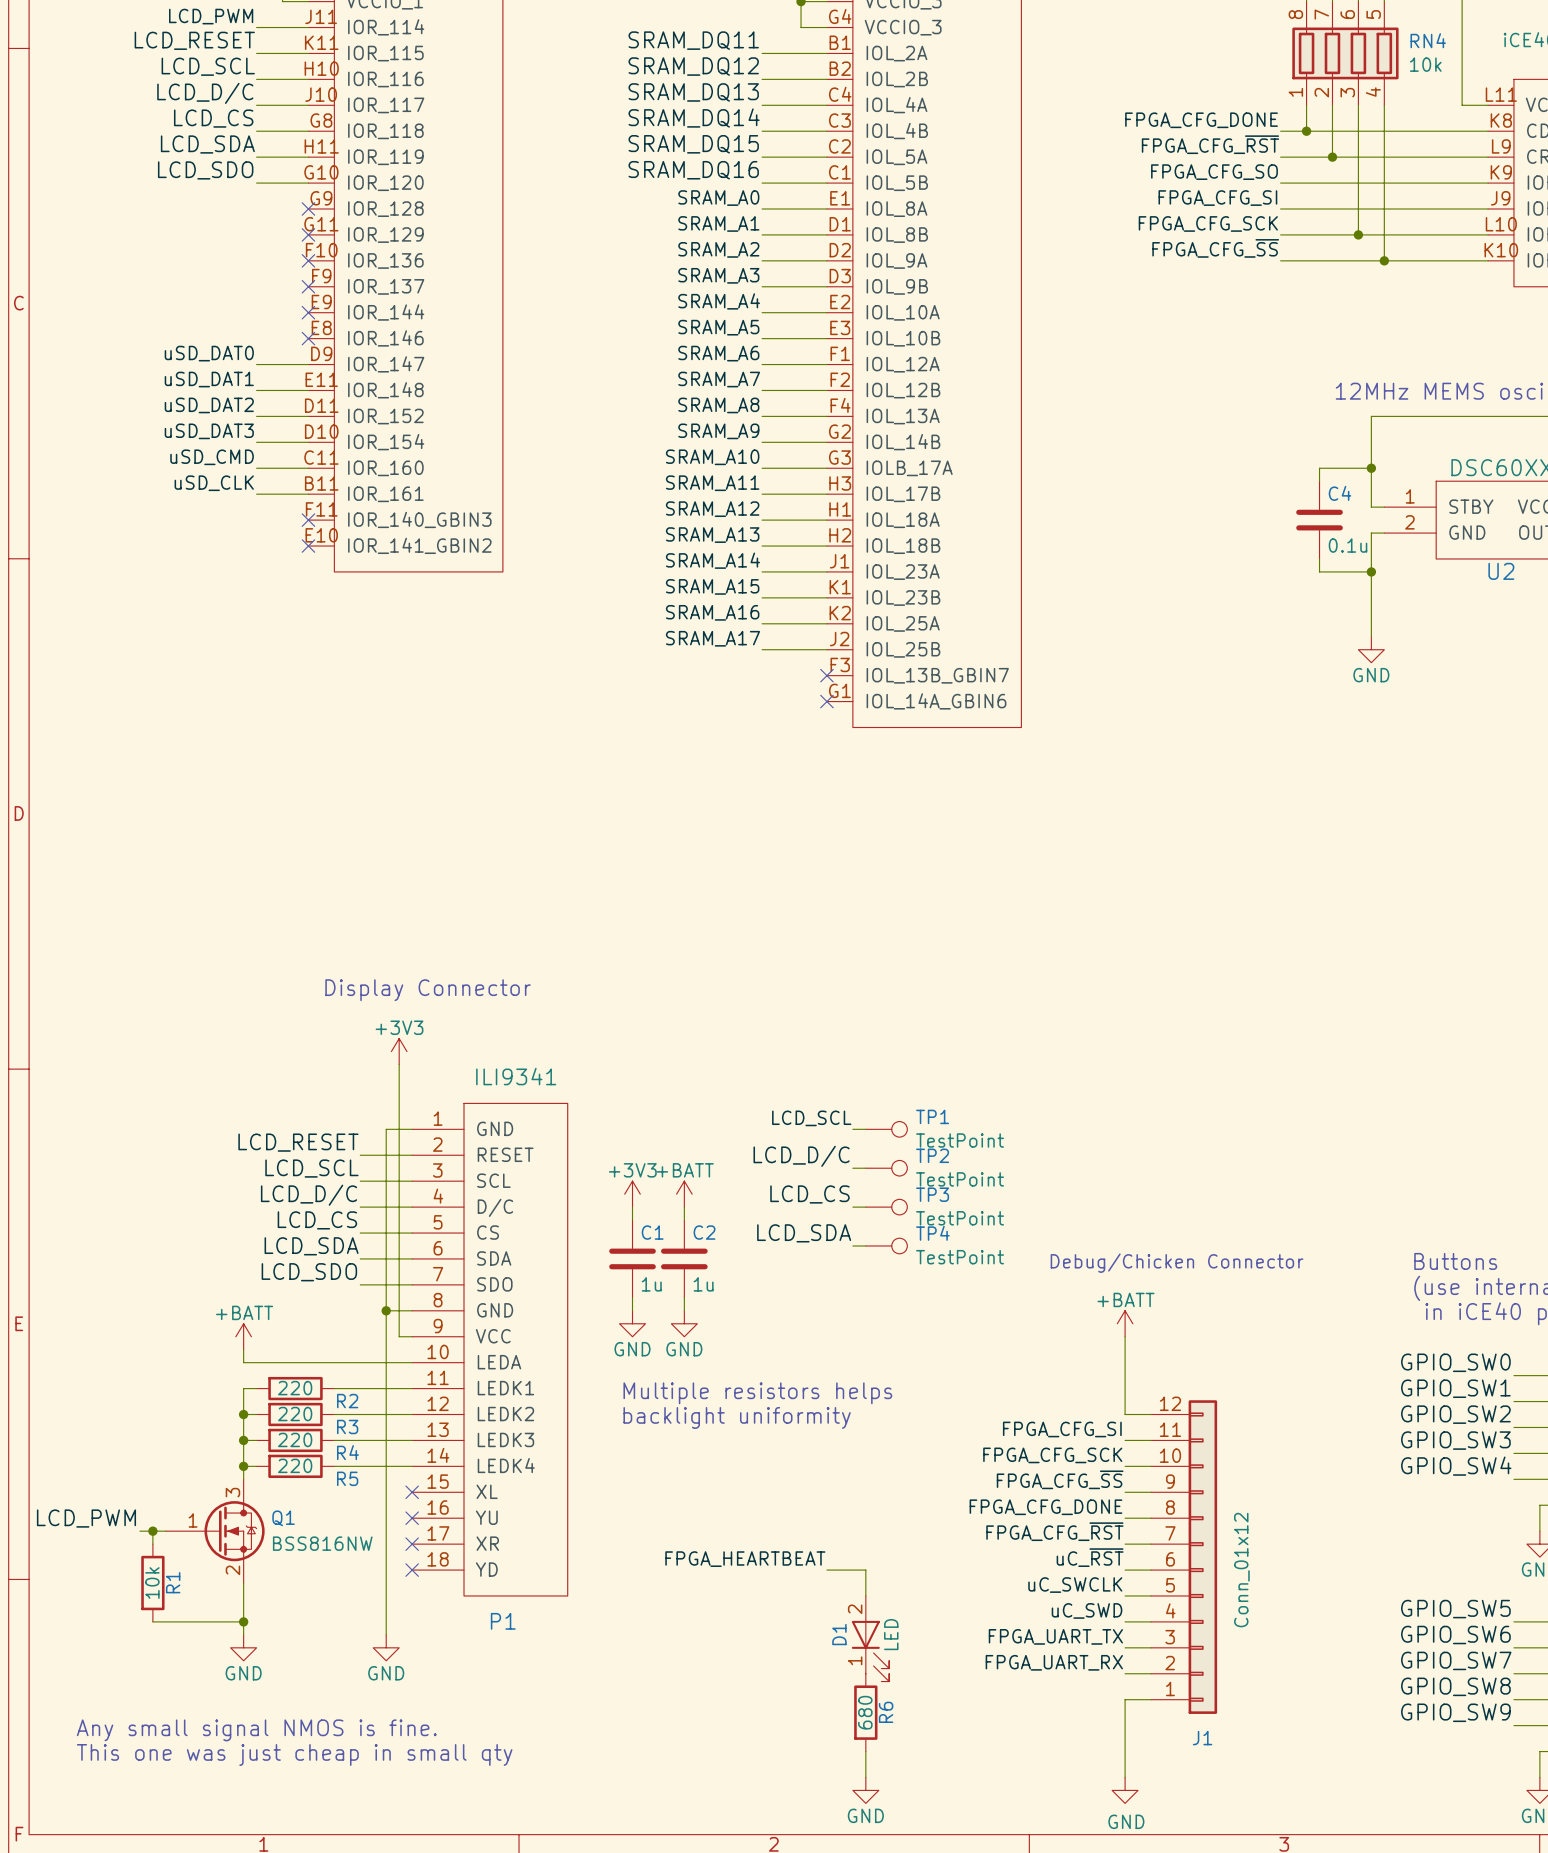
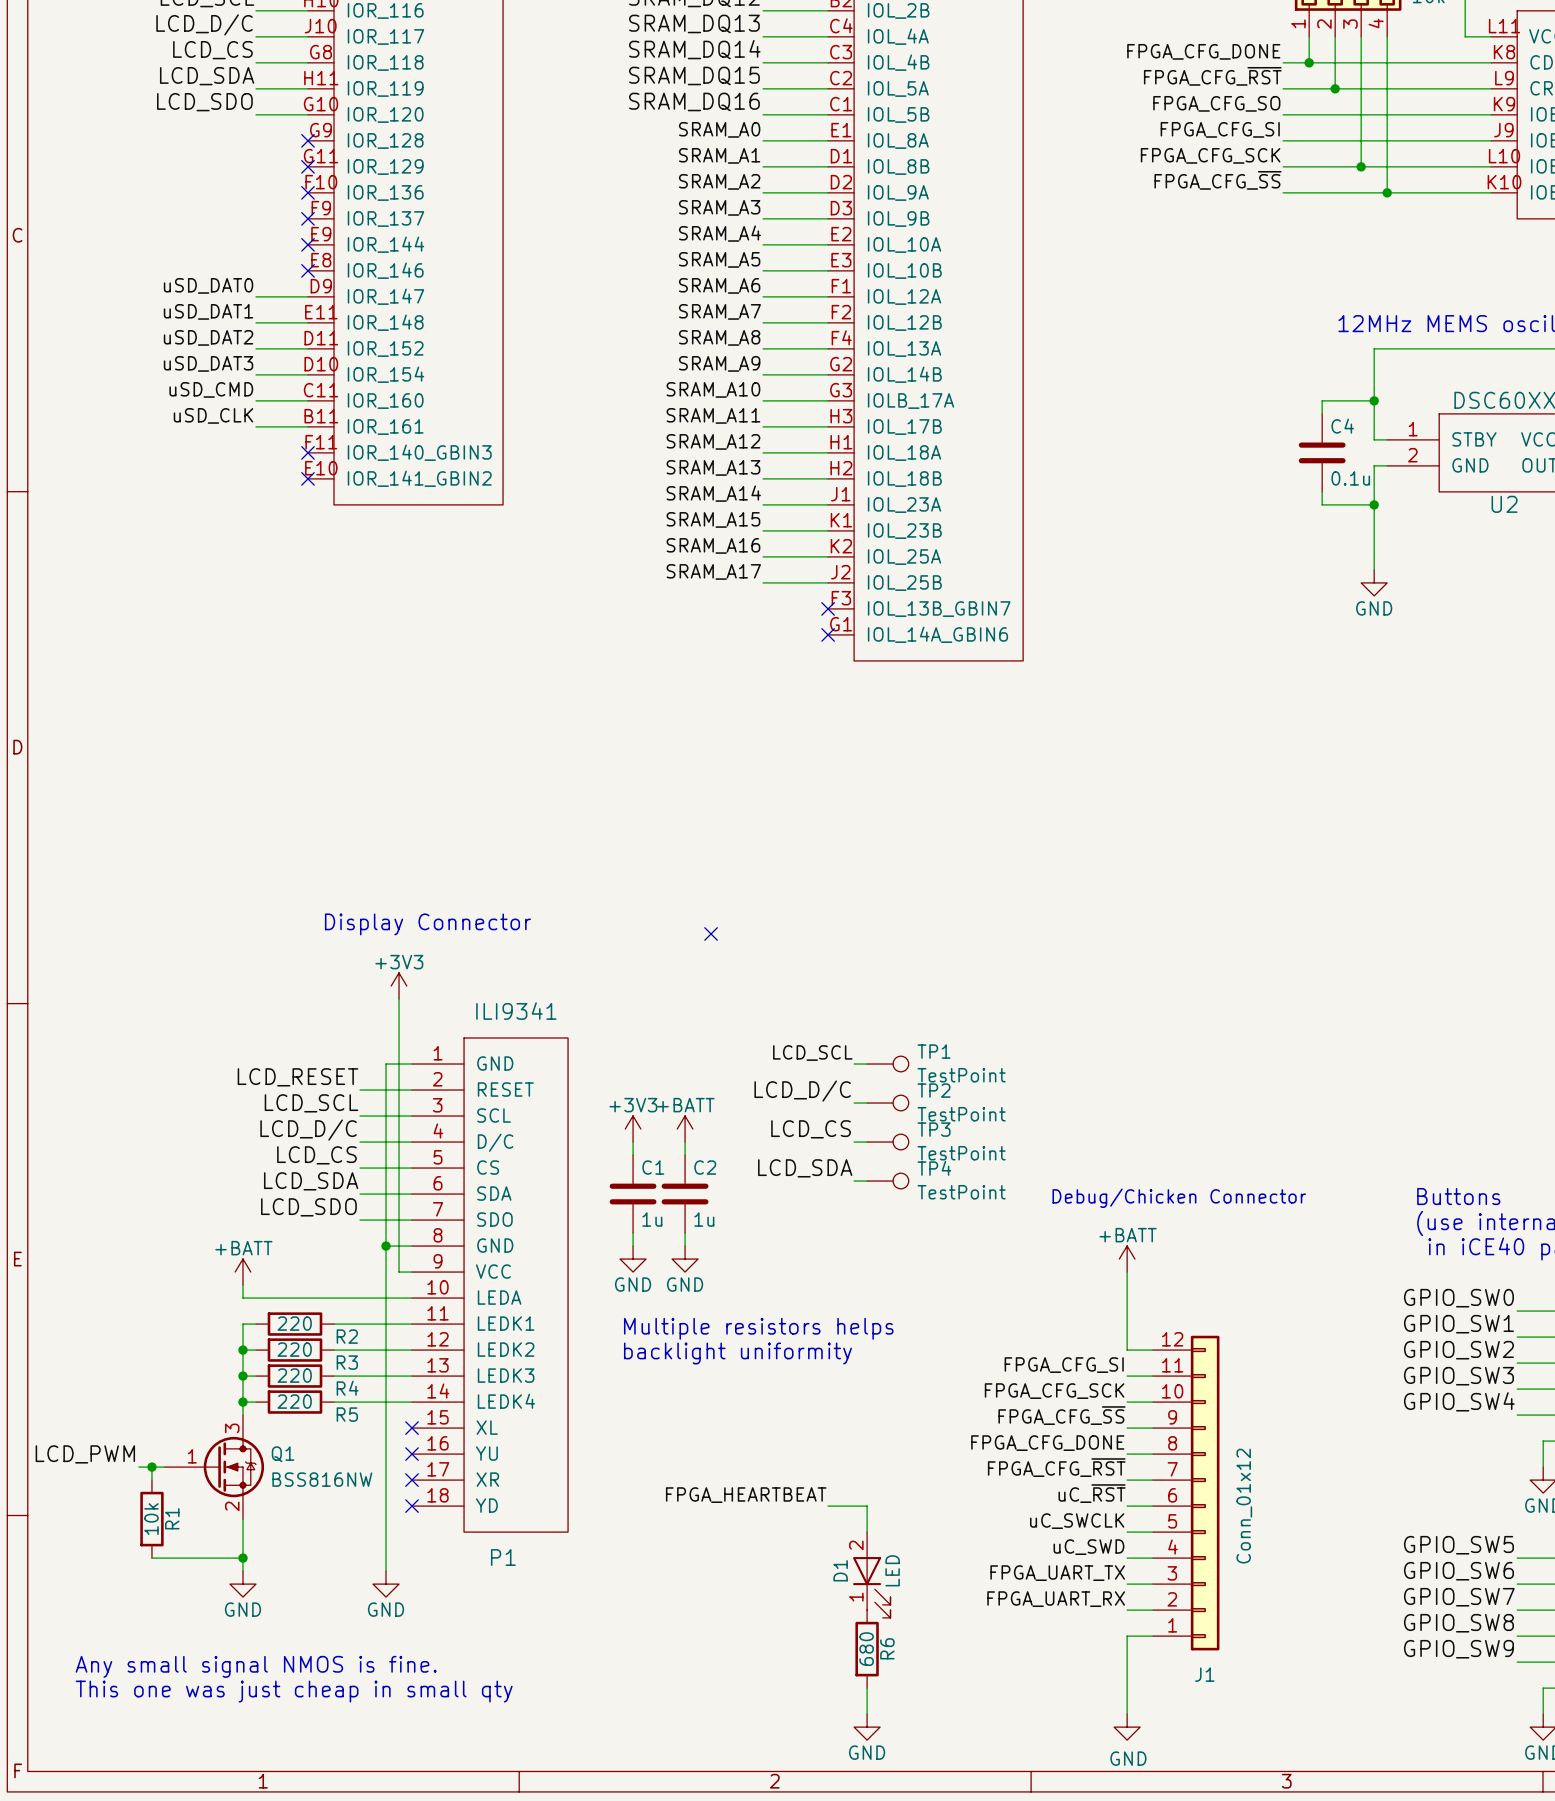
no-connect mark: none -> (711, 933)

